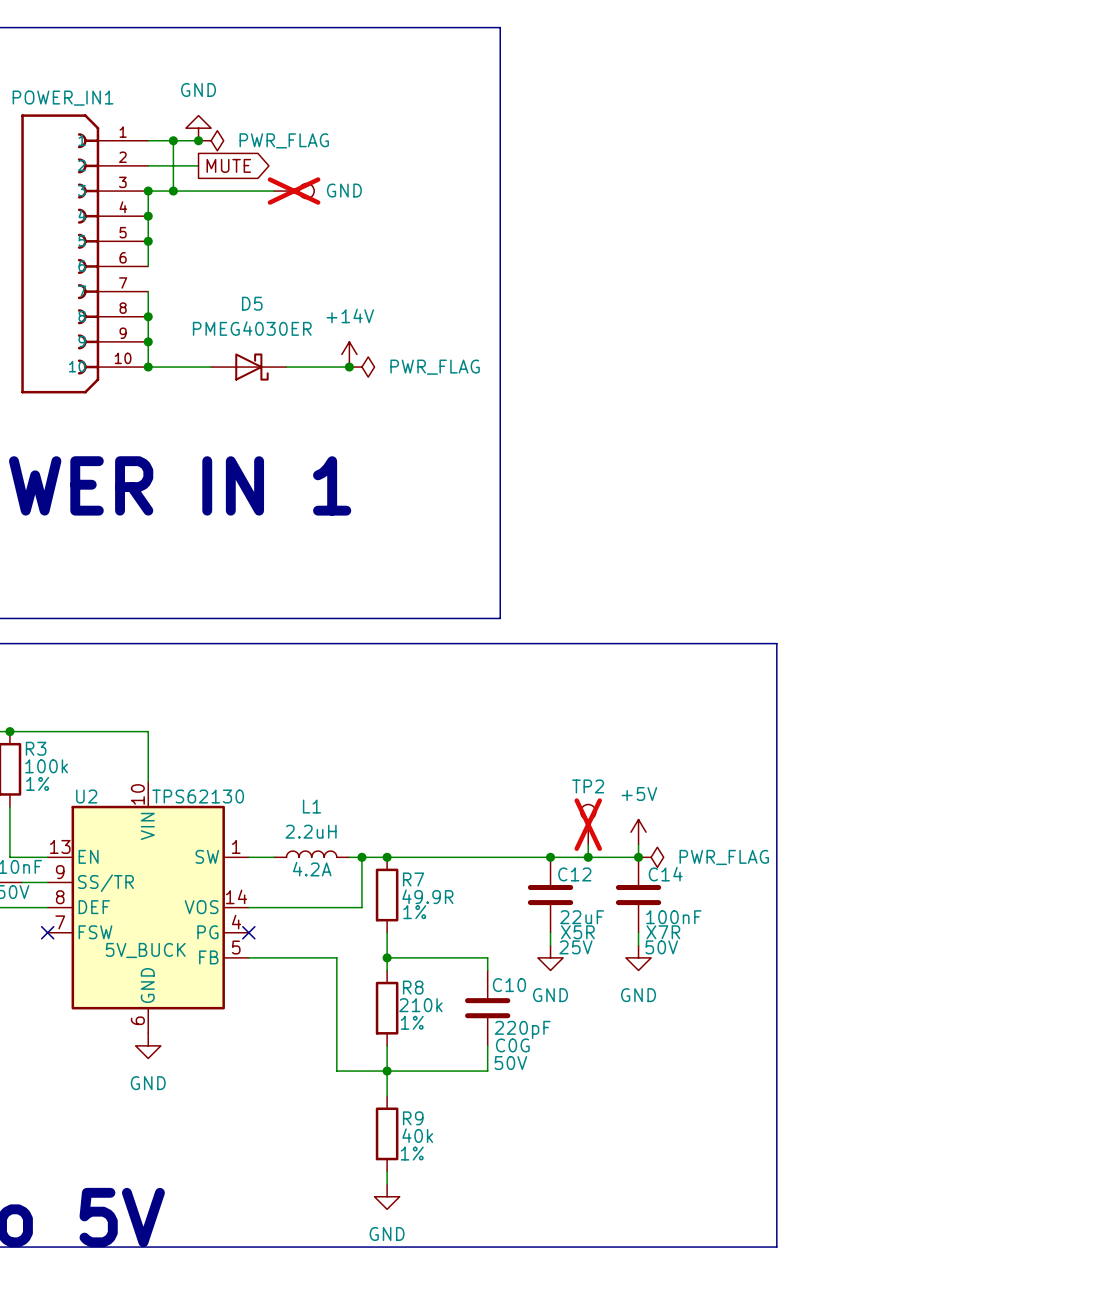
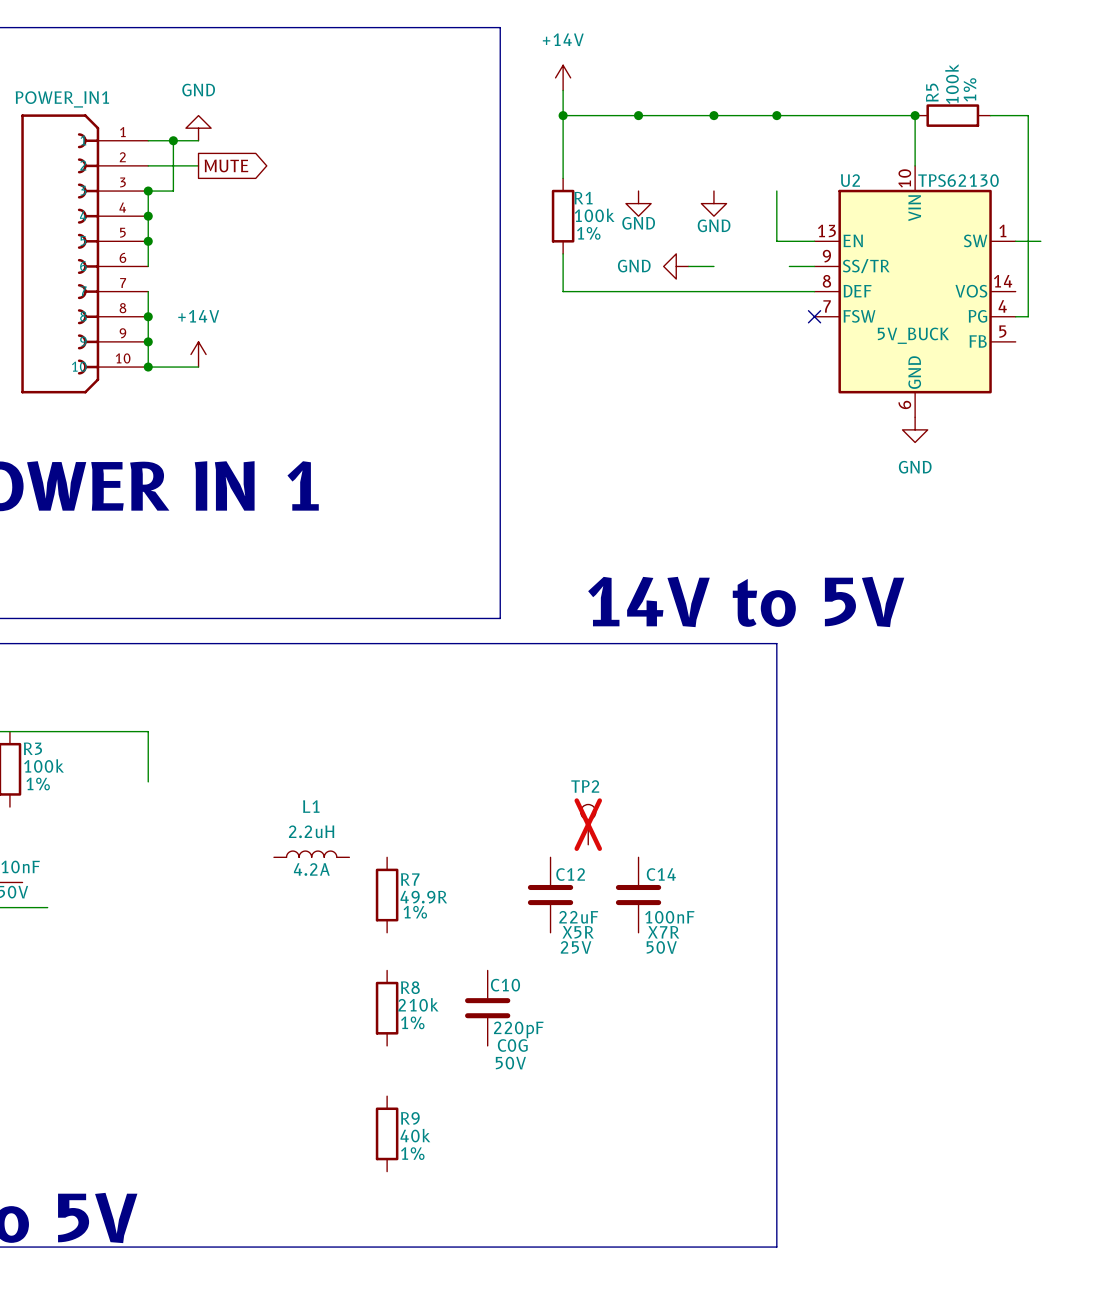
power symbol: none -> +14V (563, 77)
wire: none -> (563, 90) (563, 178)
wire: none -> (563, 115) (915, 115) (915, 165)
junction: none -> (563, 115)
junction: none -> (638, 115)
junction: none -> (713, 115)
junction: none -> (776, 115)
junction: none -> (915, 115)
R5: none -> 100k (952, 115)
wire: none -> (990, 115) (1028, 115) (1028, 316) (1015, 316)
junction: (198, 140) -> none
power symbol: PWR_FLAG (211, 140) -> none
wire: (173, 191) (273, 191) -> none
junction: (173, 191) -> none
part: GND (294, 191) -> none
wire: none -> (776, 191) (776, 241) (814, 241)
power symbol: none -> GND (638, 203)
power symbol: none -> GND (713, 203)
R1: none -> 100k (563, 216)
wire: none -> (1015, 241) (1040, 241)
wire: none -> (563, 253) (563, 291) (814, 291)
power symbol: none -> GND (676, 266)
wire: none -> (688, 266) (713, 266)
wire: none -> (789, 266) (814, 266)
no-connect mark: none -> (814, 316)
power symbol position: +14V (349, 354) -> +14V (198, 354)
wire: (198, 367) (211, 367) -> none
D5: PMEG4030ER (248, 367) -> none
wire: (286, 367) (349, 367) -> none
junction: (349, 367) -> none
power symbol: PWR_FLAG (361, 367) -> none
power symbol: none -> GND (915, 429)
text: none -> 14V to 5V (746, 601)
junction: (9, 731) -> none
wire: (9, 807) (9, 857) (47, 857) -> none
power symbol: +5V (638, 832) -> none
wire: (588, 844) (588, 857) -> none
wire: (638, 844) (638, 857) (349, 857) -> none
wire: (248, 857) (273, 857) -> none
wire: (361, 857) (361, 907) (248, 907) -> none
junction: (361, 857) -> none
junction: (387, 857) -> none
junction: (550, 857) -> none
junction: (588, 857) -> none
junction: (638, 857) -> none
power symbol: PWR_FLAG (651, 857) -> none
wire: (22, 882) (47, 882) -> none
U2 position: (148, 907) -> (915, 291)
no-connect mark: (47, 932) -> none
no-connect mark: (248, 932) -> none
wire: (387, 932) (387, 970) -> none
wire: (550, 932) (550, 945) -> none
wire: (638, 932) (638, 945) -> none
wire: (248, 957) (336, 957) (336, 1071) (487, 1071) (487, 1045) -> none
wire: (387, 957) (487, 957) (487, 970) -> none
junction: (387, 957) -> none
power symbol: GND (550, 957) -> none
power symbol: GND (638, 957) -> none
power symbol: GND (148, 1045) -> none
wire: (387, 1045) (387, 1096) -> none
junction: (387, 1071) -> none
wire: (387, 1171) (387, 1184) -> none
power symbol: GND (387, 1196) -> none

